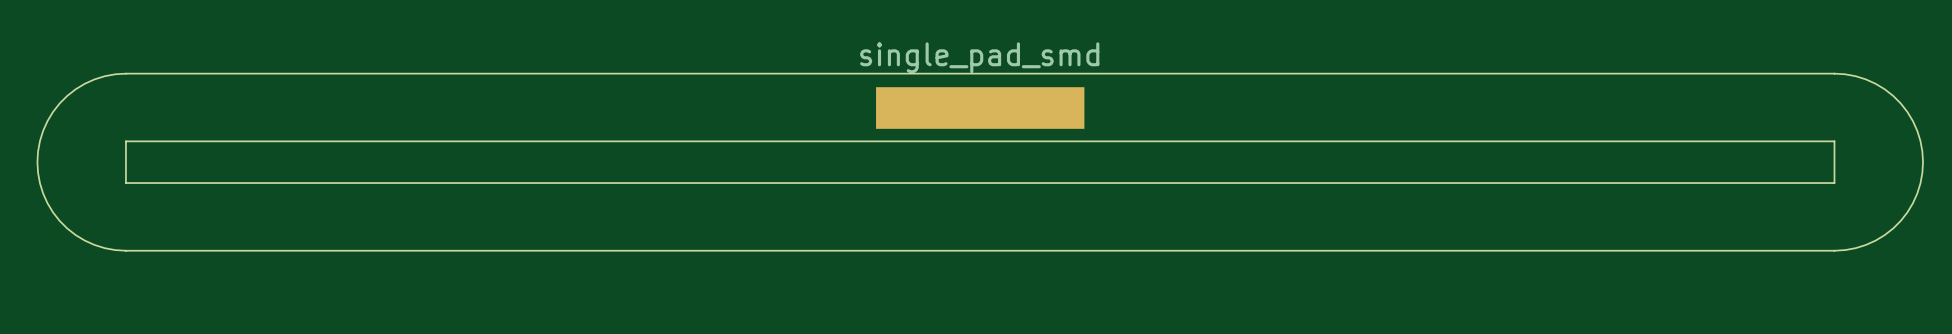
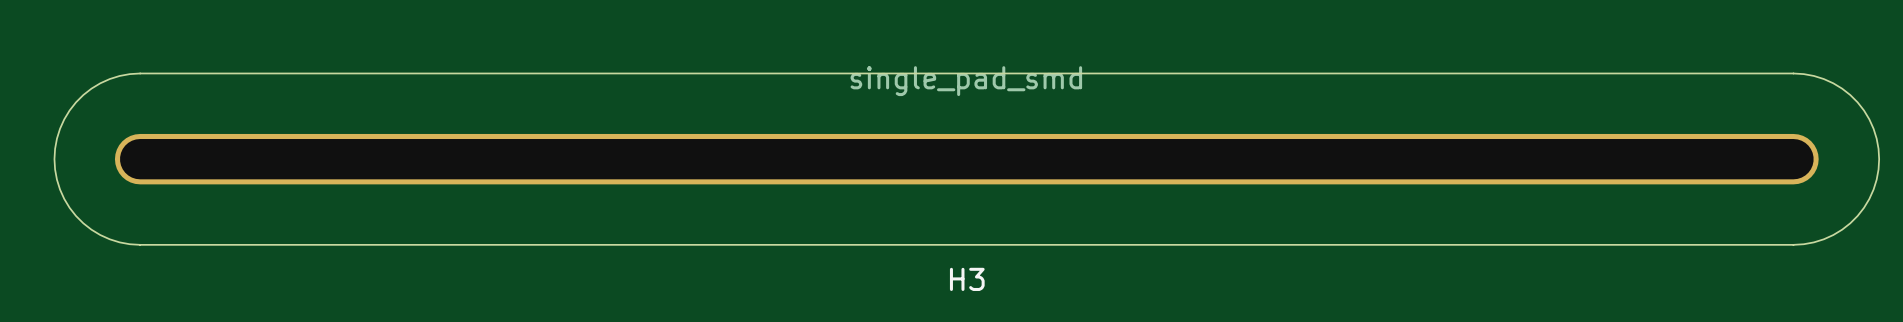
part: single_pad_smd (980, 108) -> none
board edge: (125, 141) (125, 183) (1834, 183) (1834, 141) (125, 141) -> none
H3: none -> single_pad_smd (966, 159)

